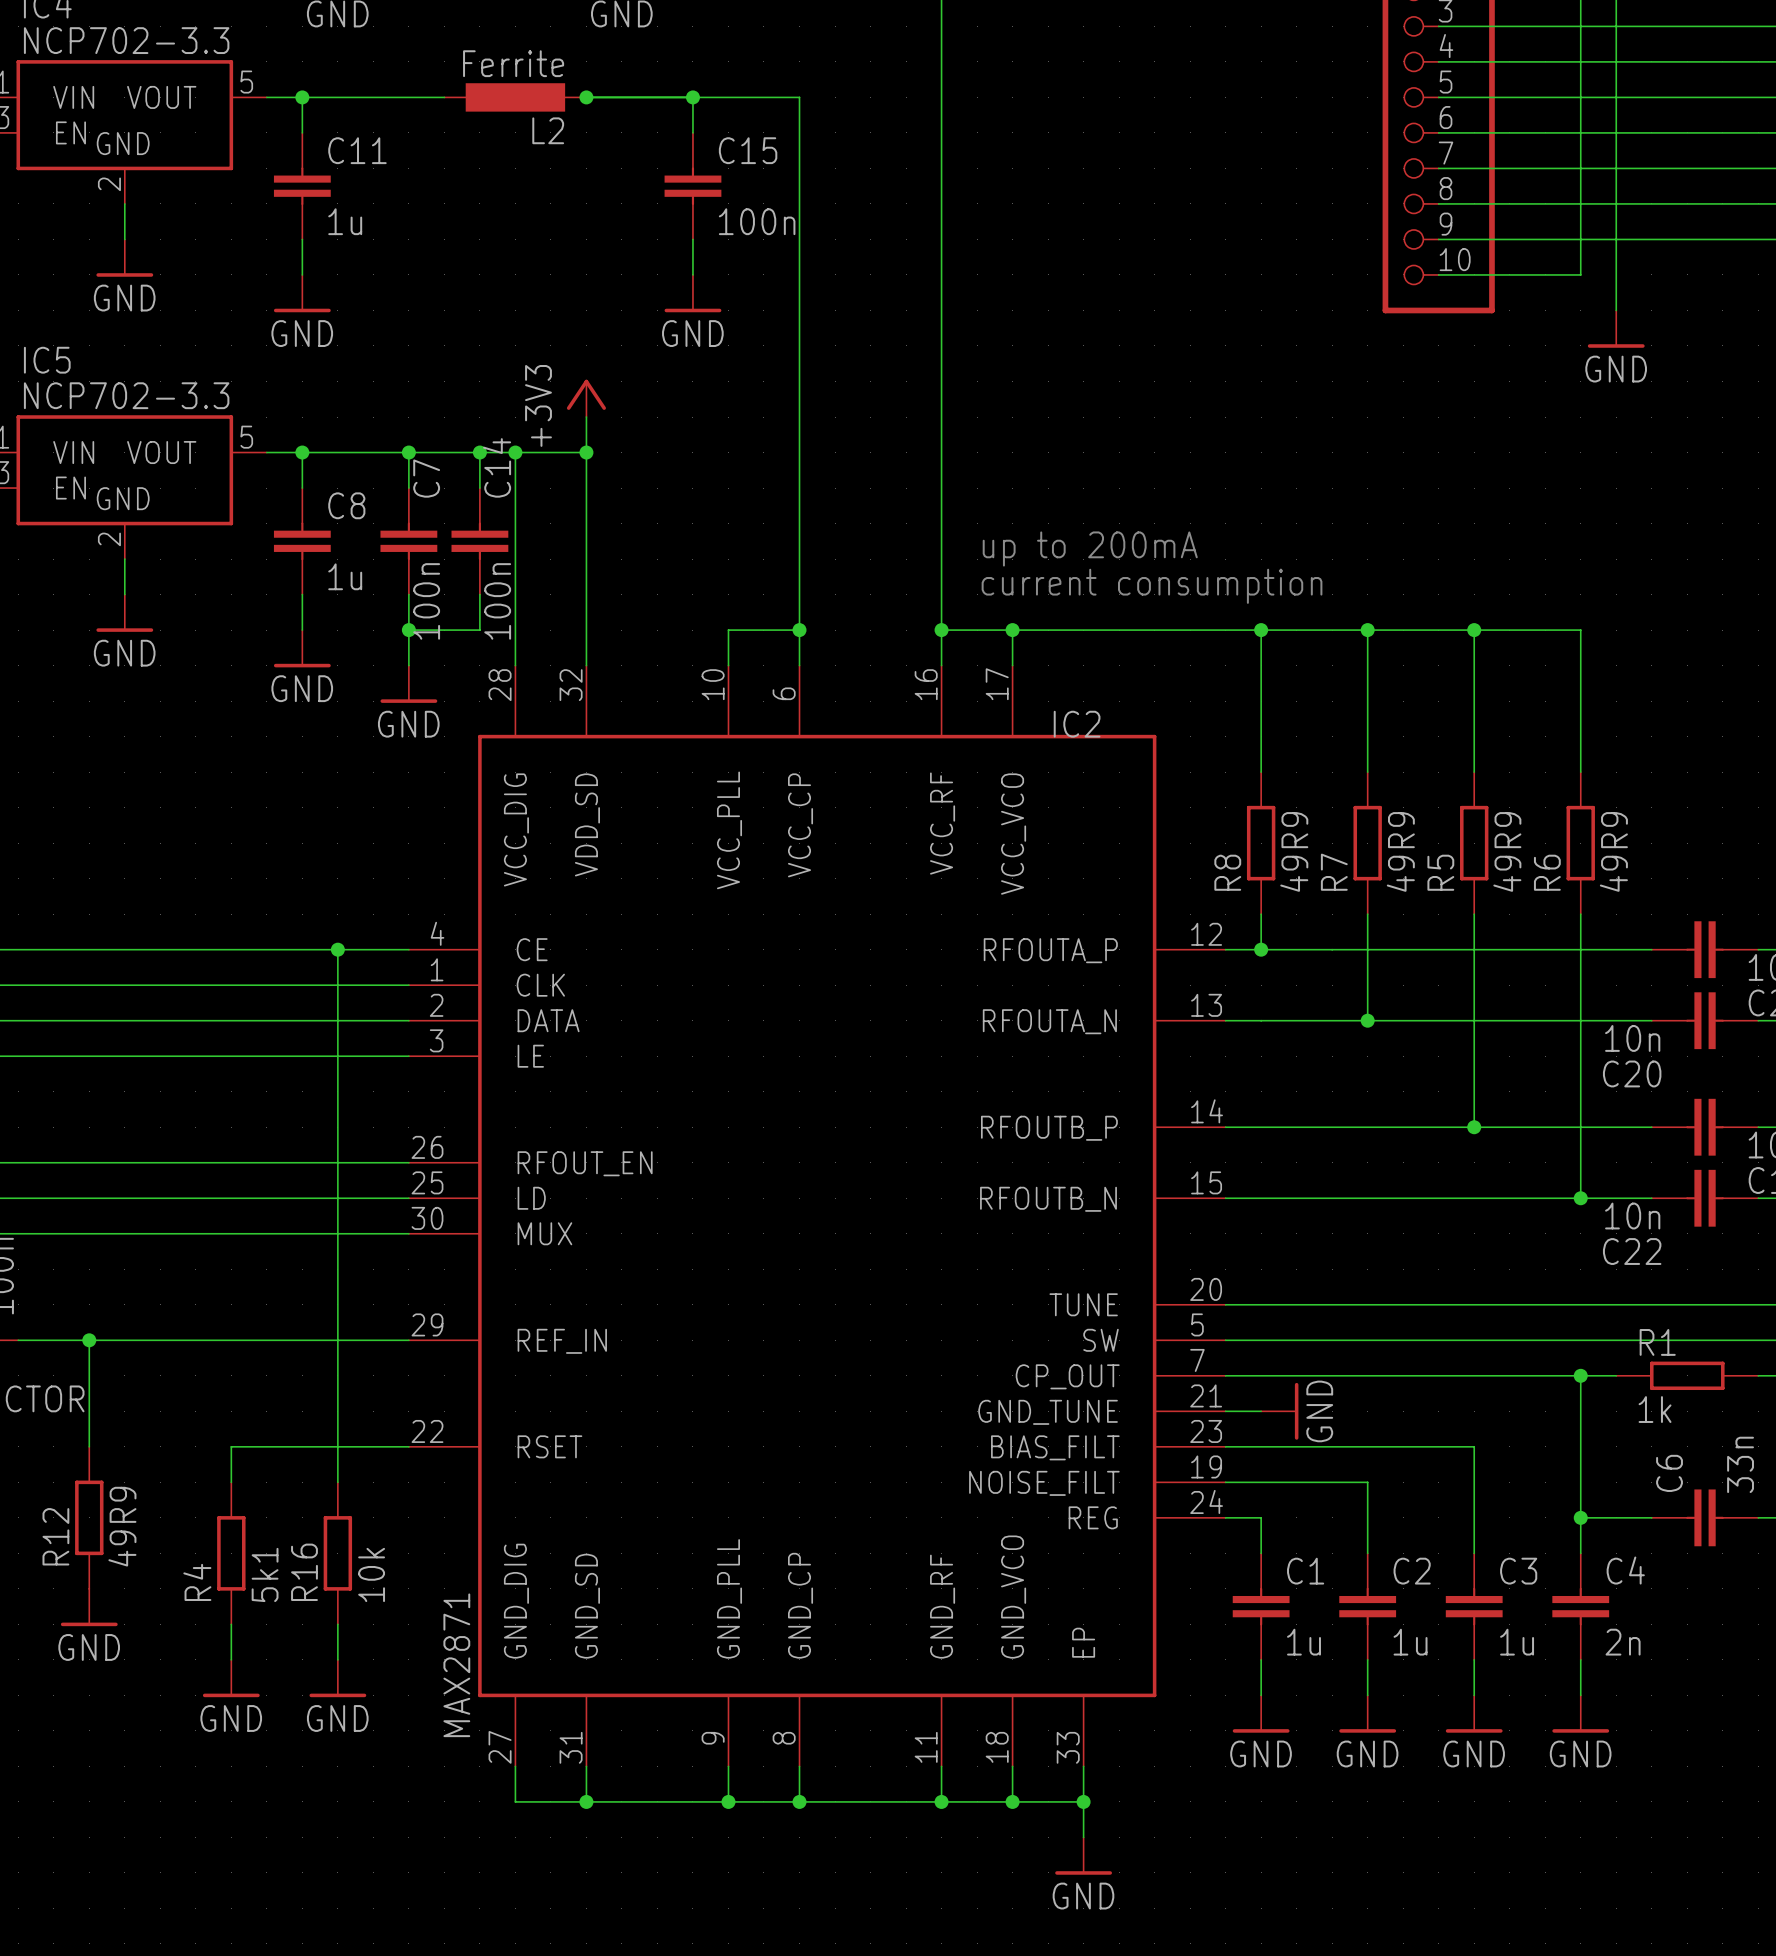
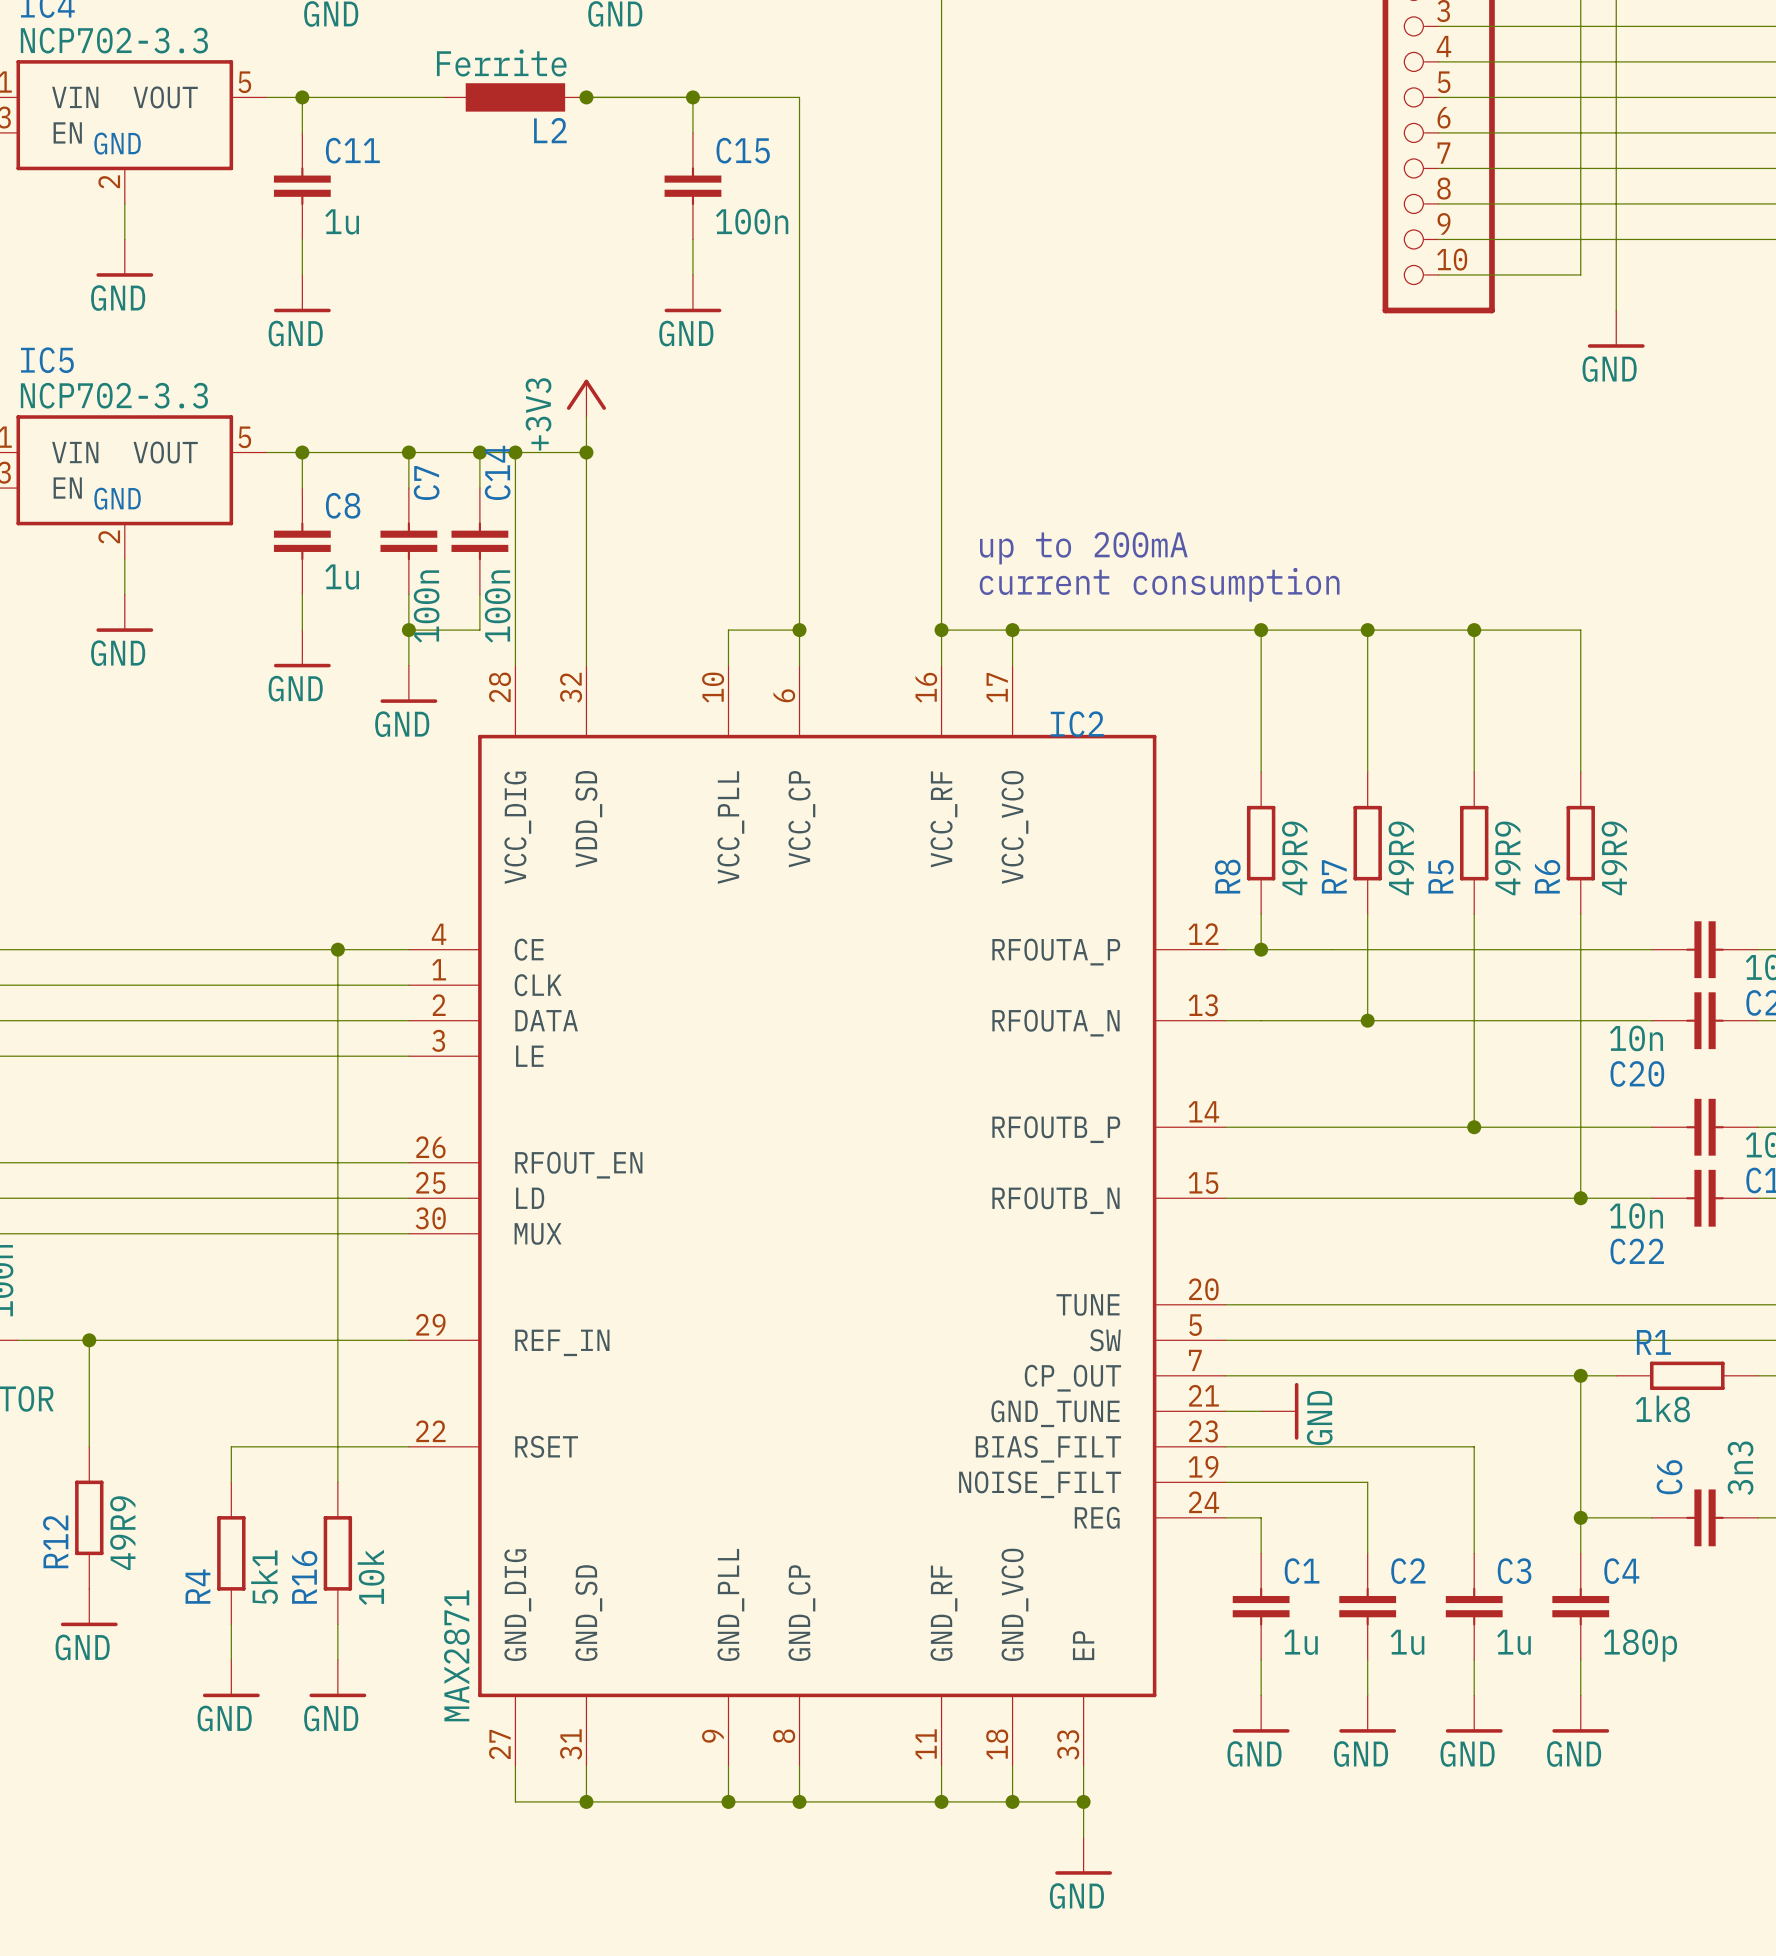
R1 value: 1k (1655, 1409) -> 1k8 (1662, 1409)
C6 value: 33n (1740, 1464) -> 3n3 (1740, 1468)
C4 value: 2n (1623, 1642) -> 180p (1640, 1645)

